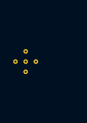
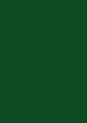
part: (25, 61) -> none

